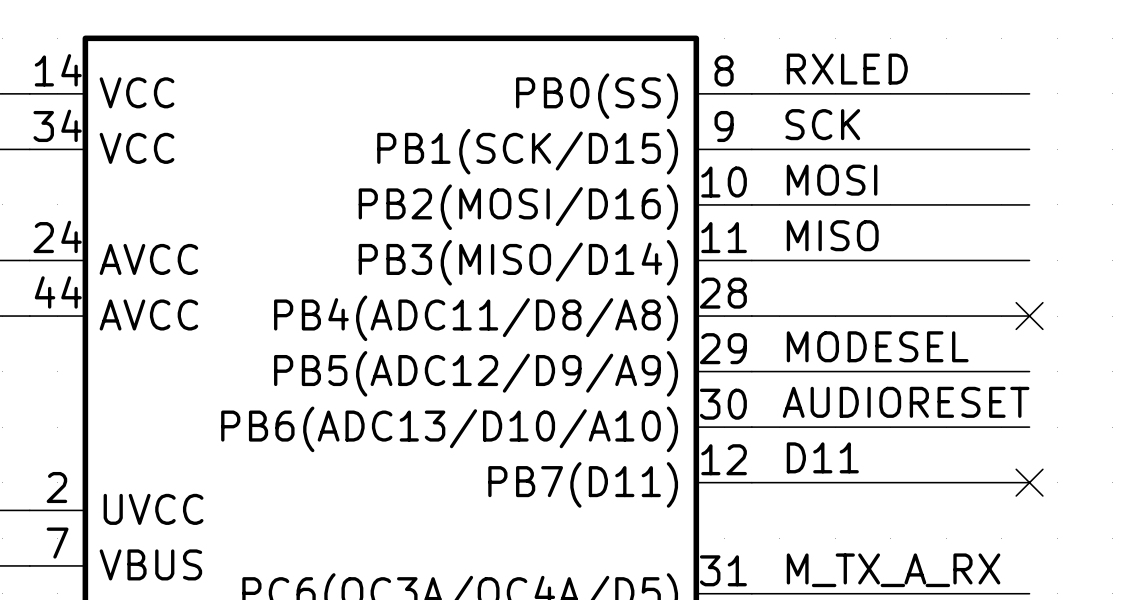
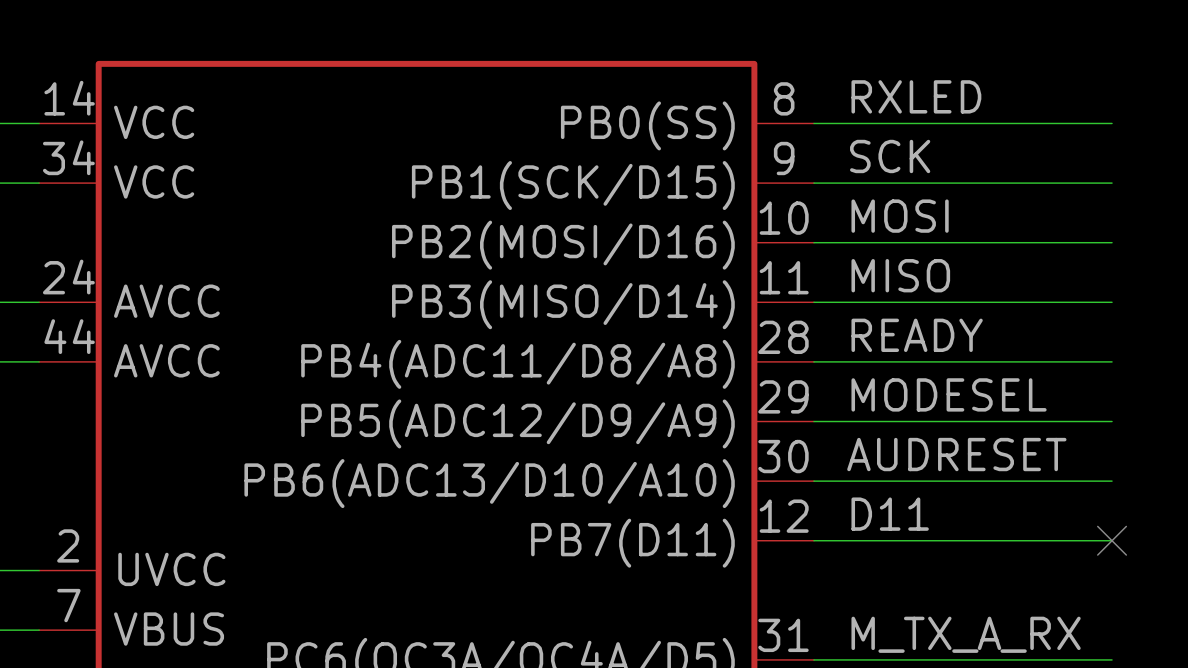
label: none -> READY (917, 335)
no-connect mark: (1029, 316) -> none
label: AUDIORESET (906, 402) -> AUDRESET (956, 454)

